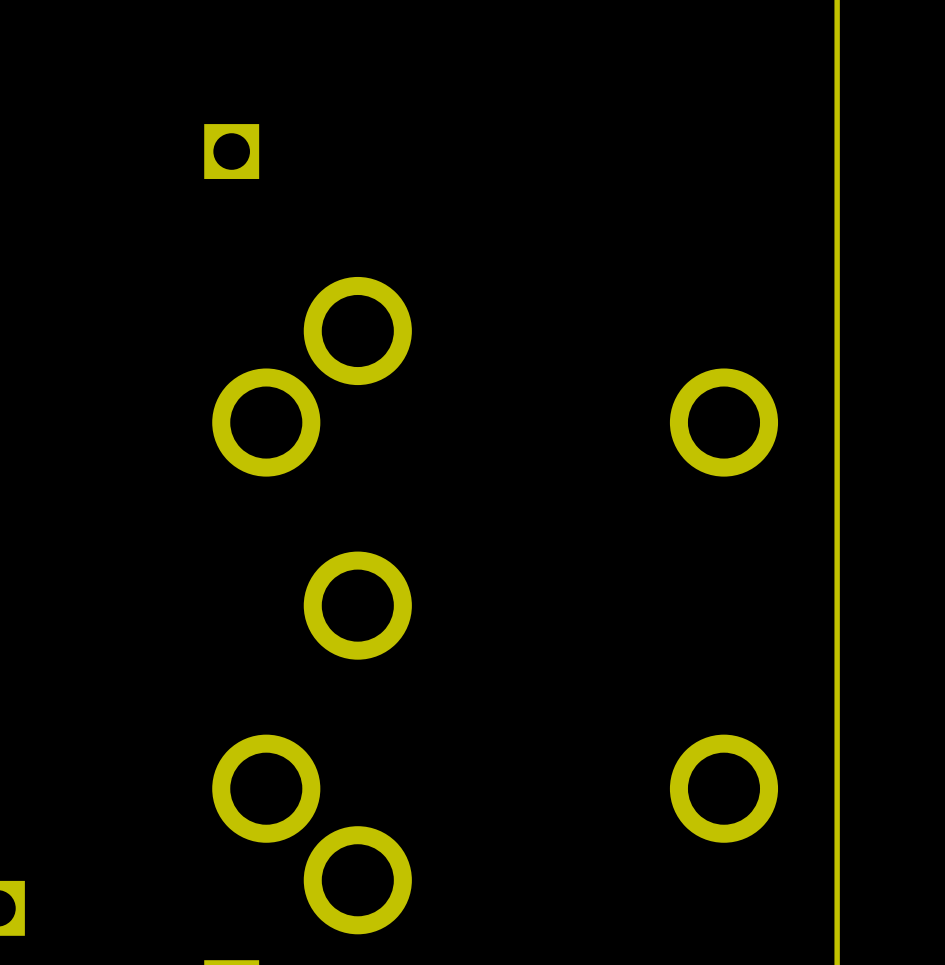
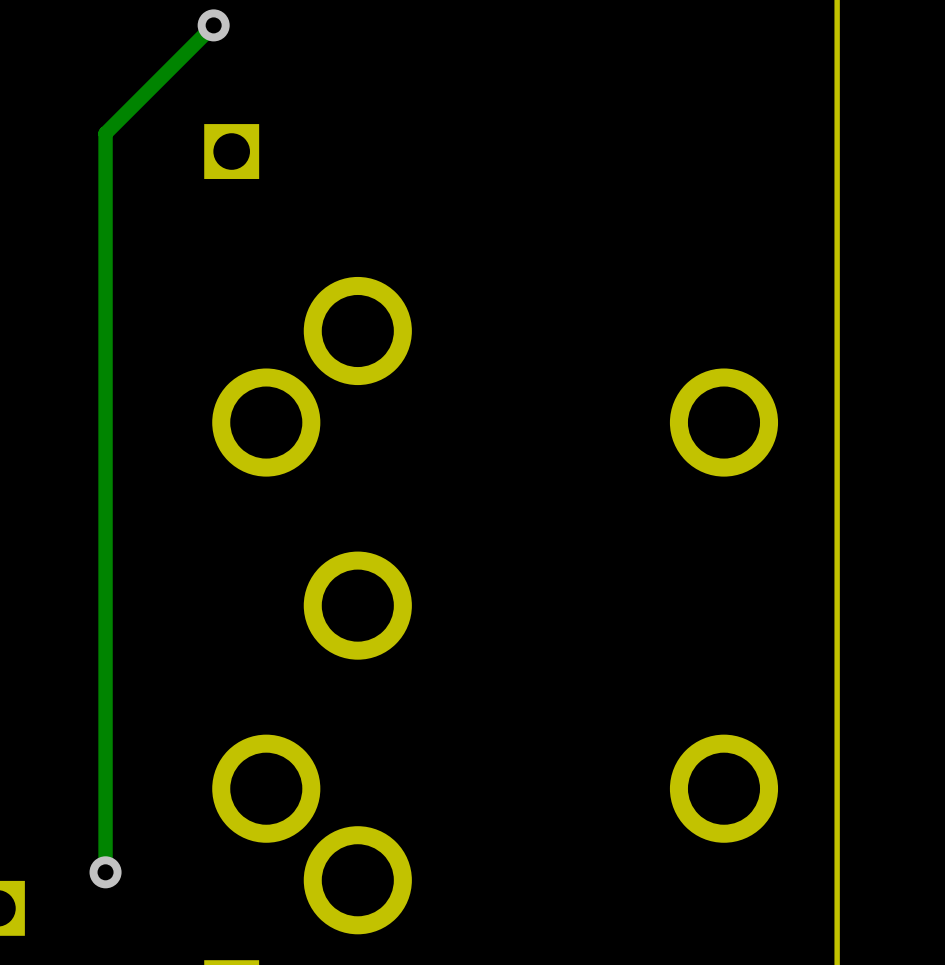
track: none -> (213, 25) (105, 133) (105, 872)
via: none -> (213, 25)
via: none -> (105, 872)

